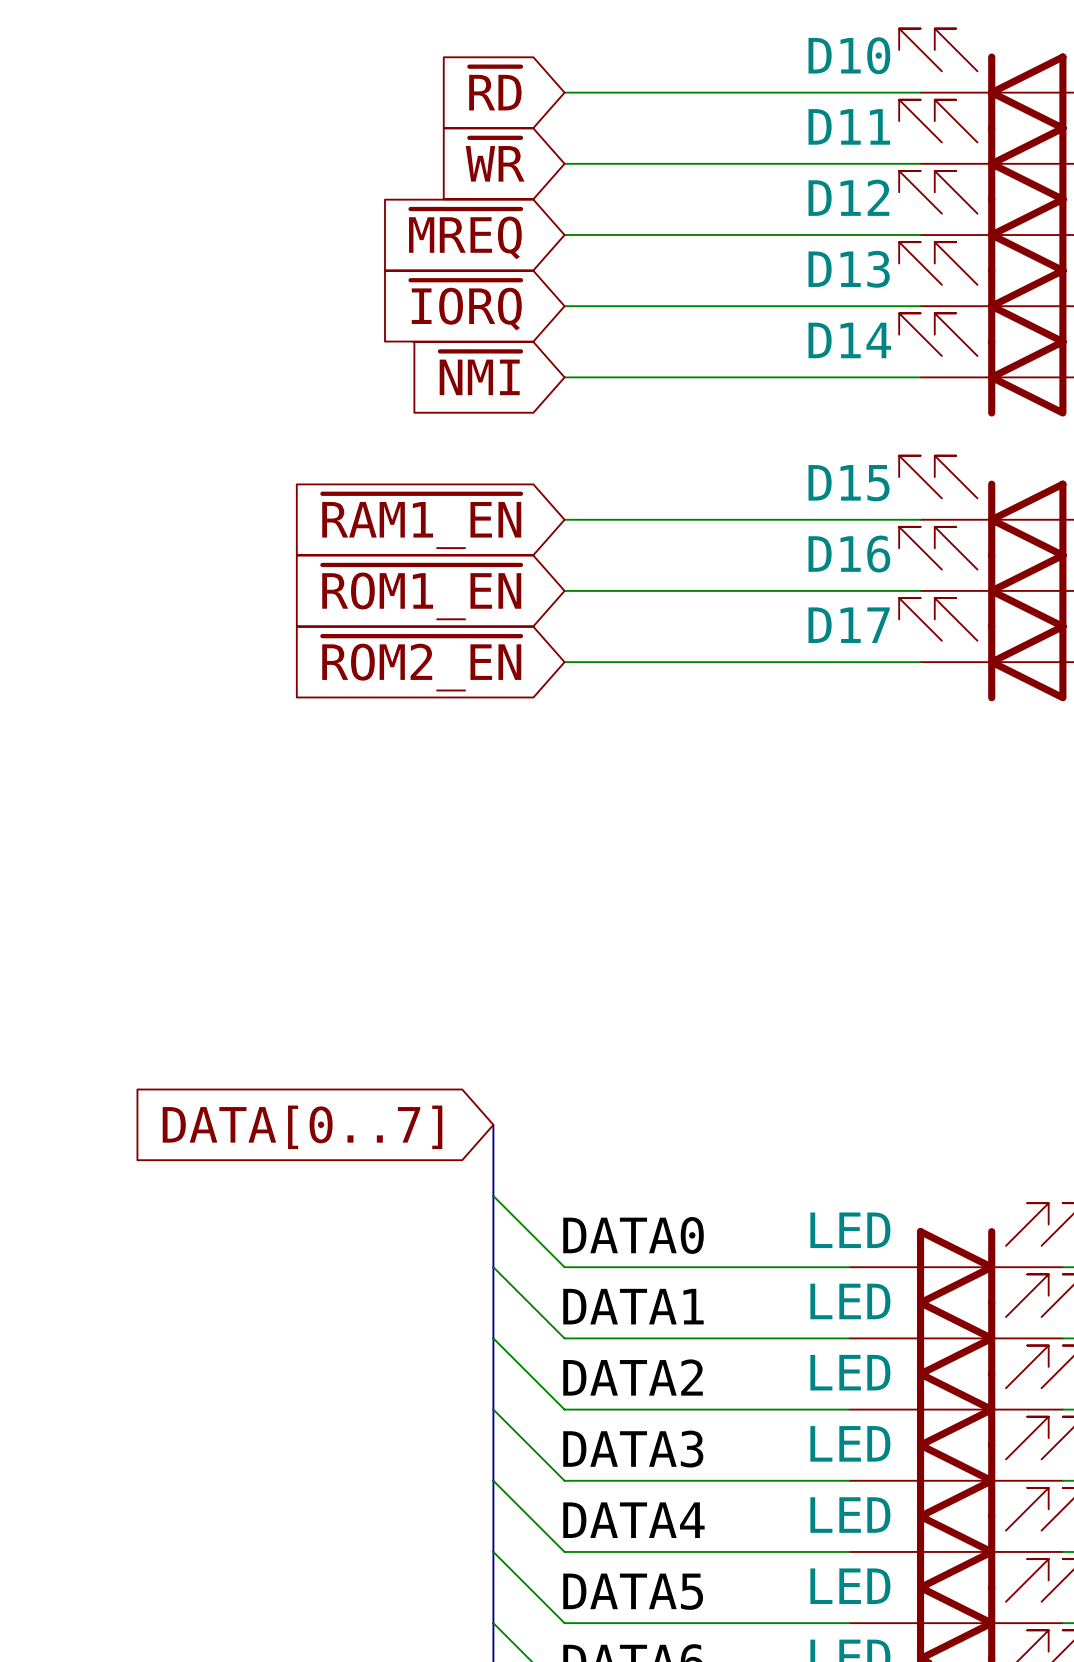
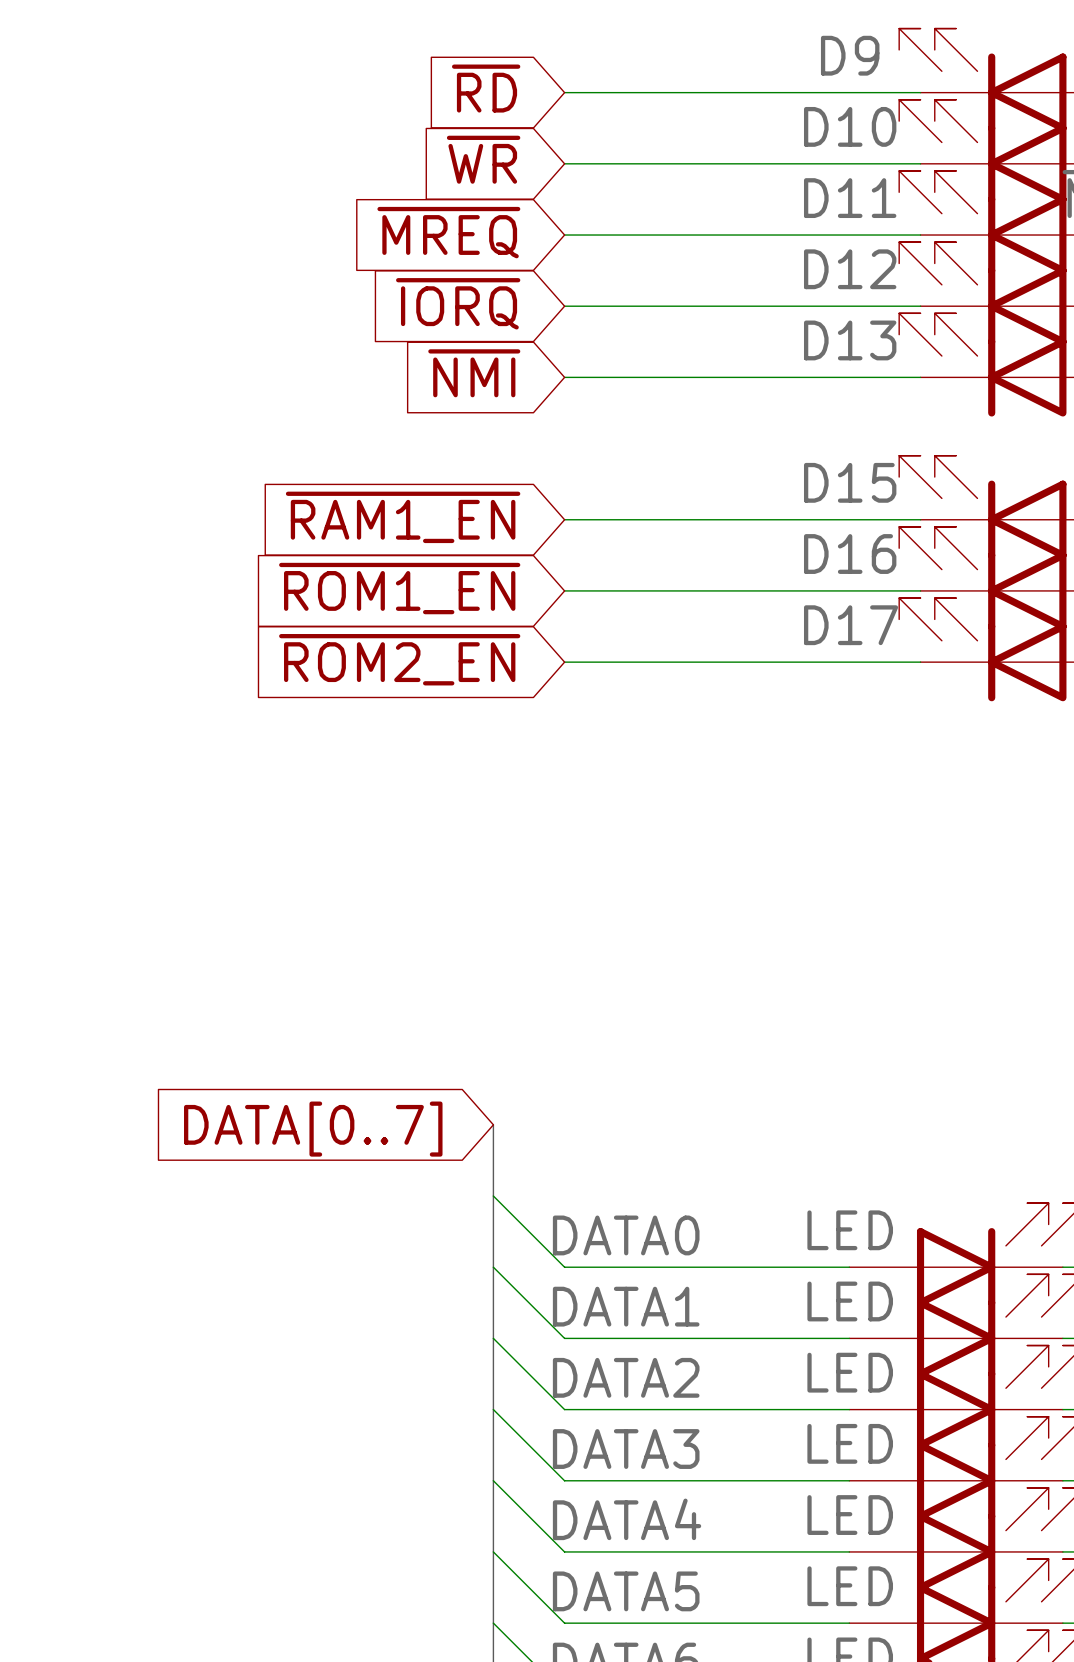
D10 name: D10 (849, 55) -> D9 (850, 55)
D11 name: D11 (849, 126) -> D10 (850, 126)
D12 name: D12 (848, 197) -> D11 (850, 198)
D13 name: D13 (849, 269) -> D12 (850, 269)
D14 name: D14 (849, 340) -> D13 (850, 340)

